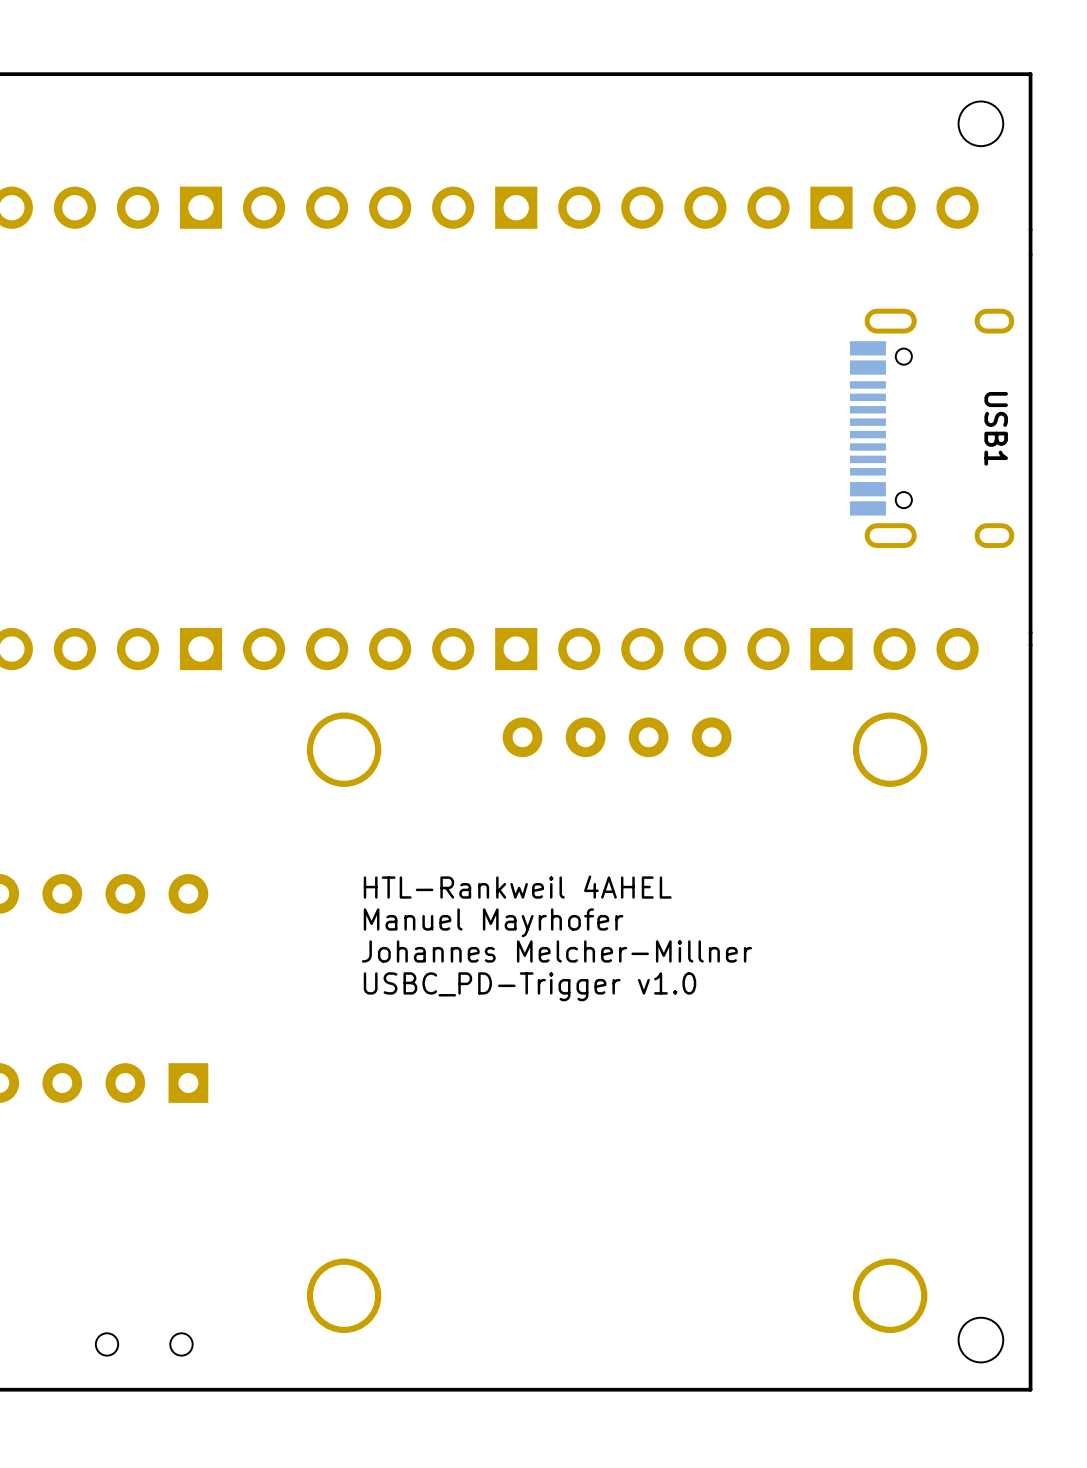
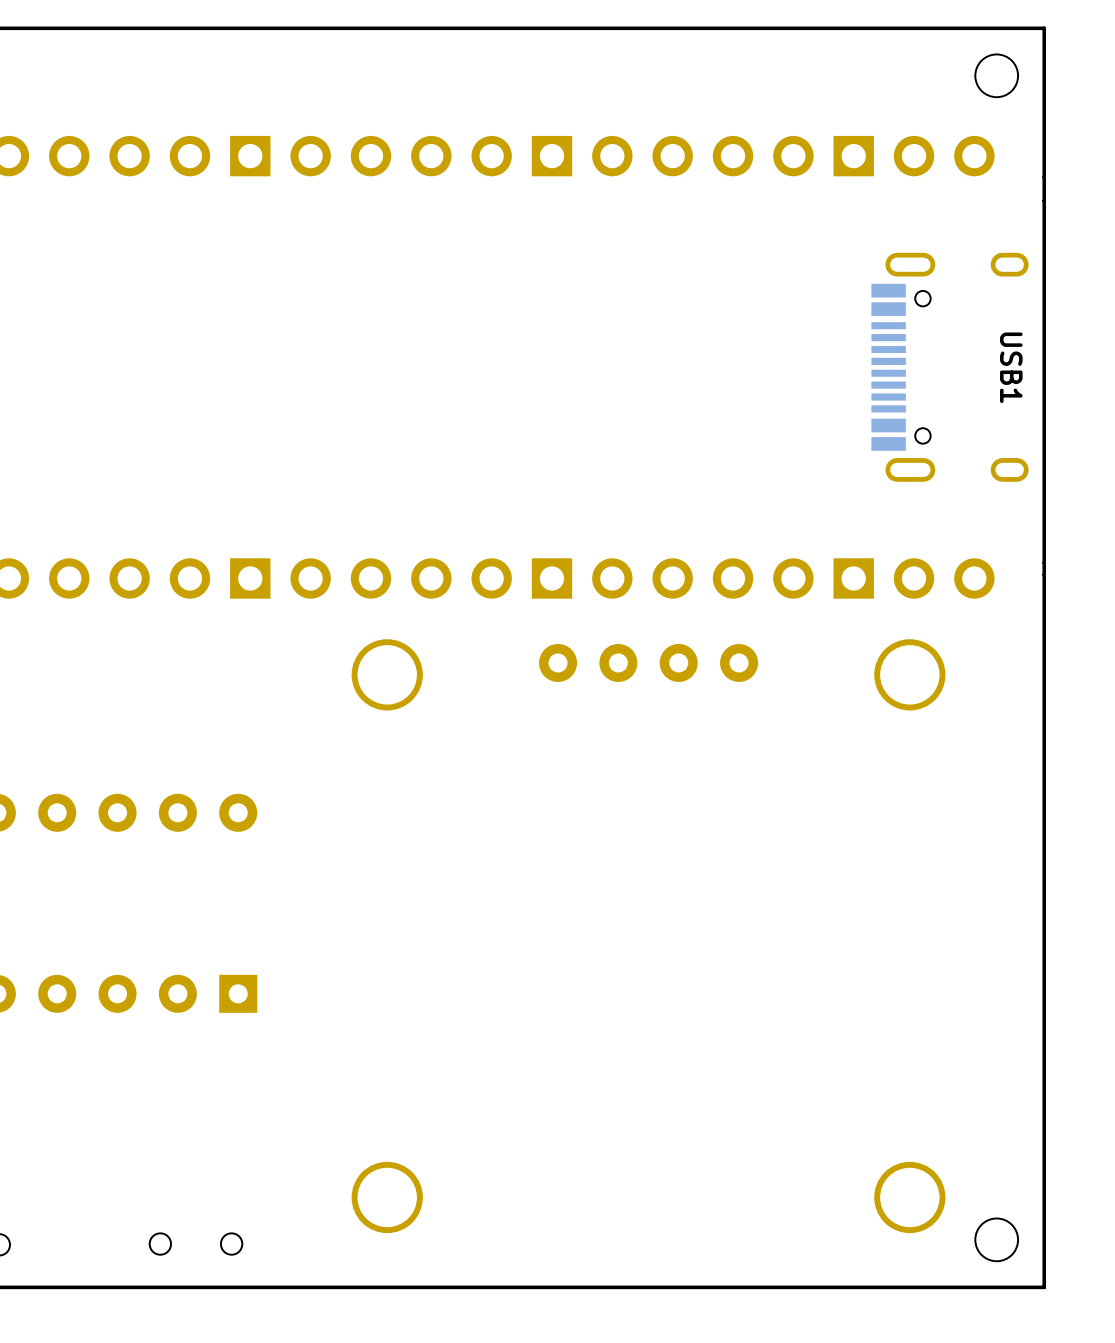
text: HTL-Rankweil 4AHEL (517, 887) -> none
text: Manuel Mayrhofer (493, 922) -> none
text: Johannes Melcher-Millner (556, 951) -> none
text: USBC_PD-Trigger v1.0 (529, 986) -> none

